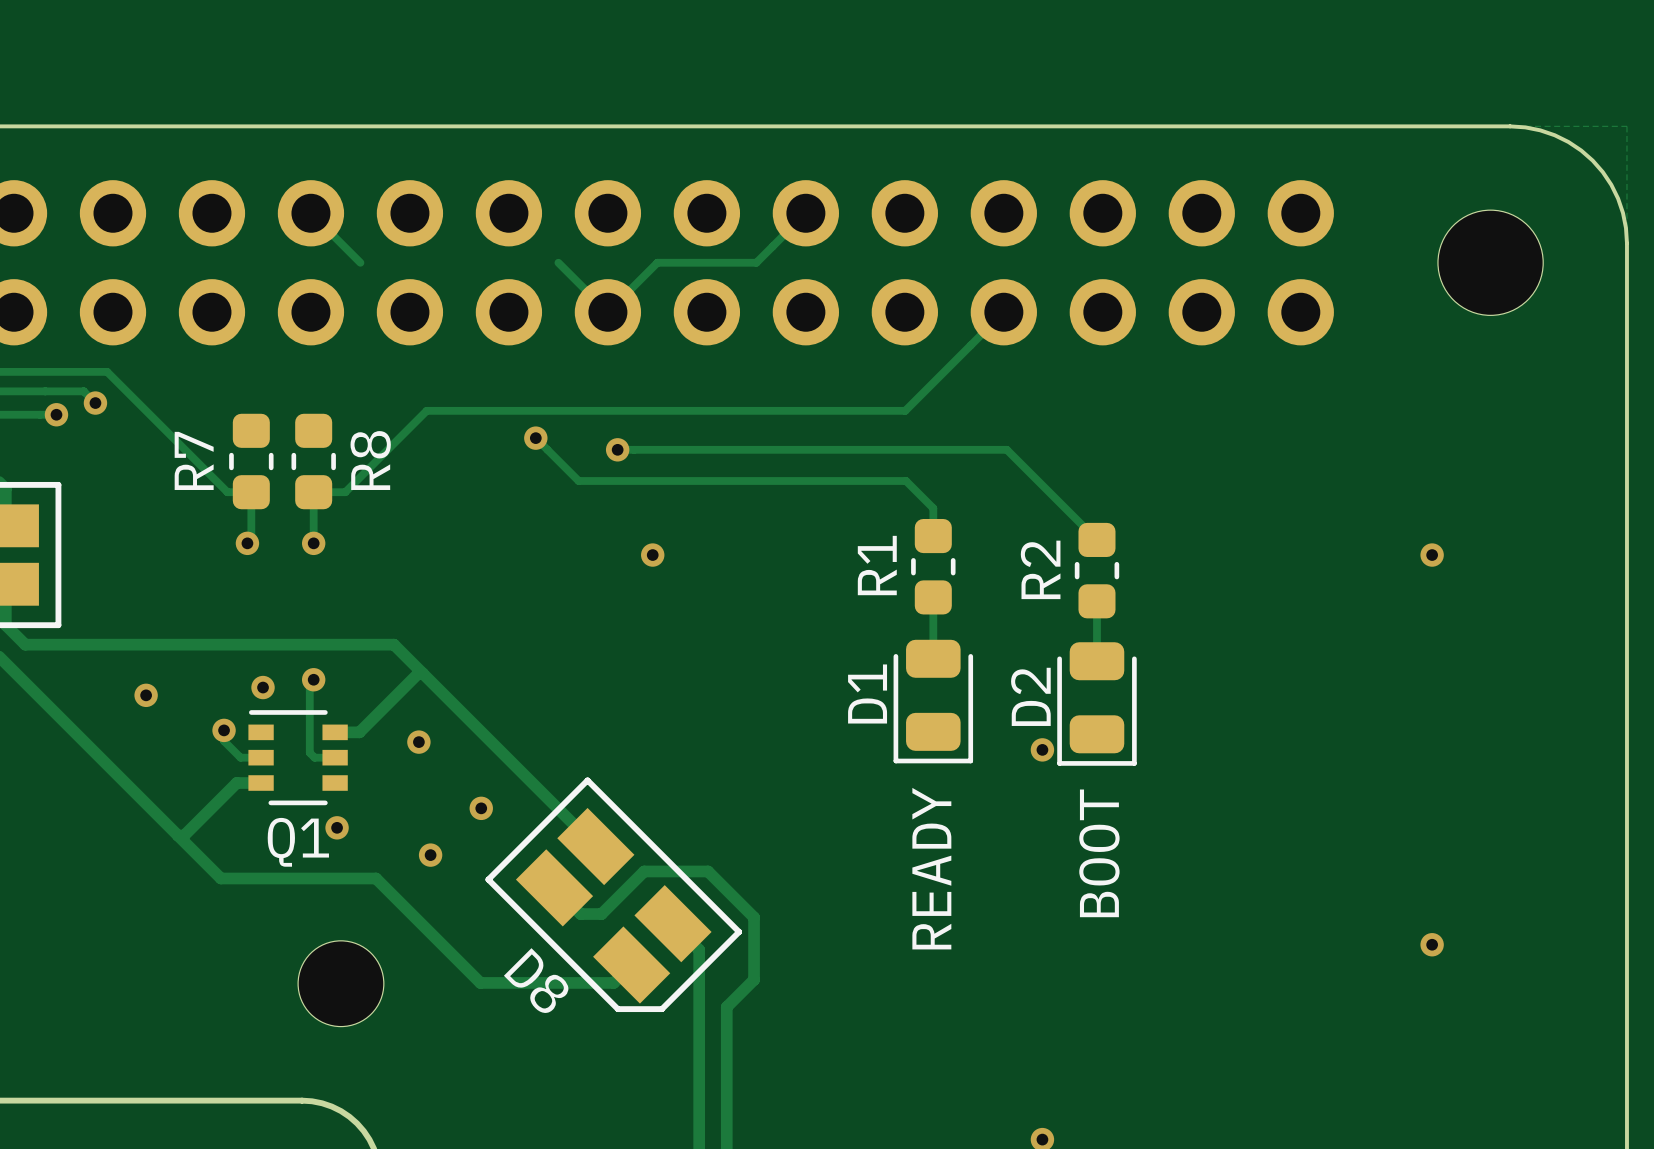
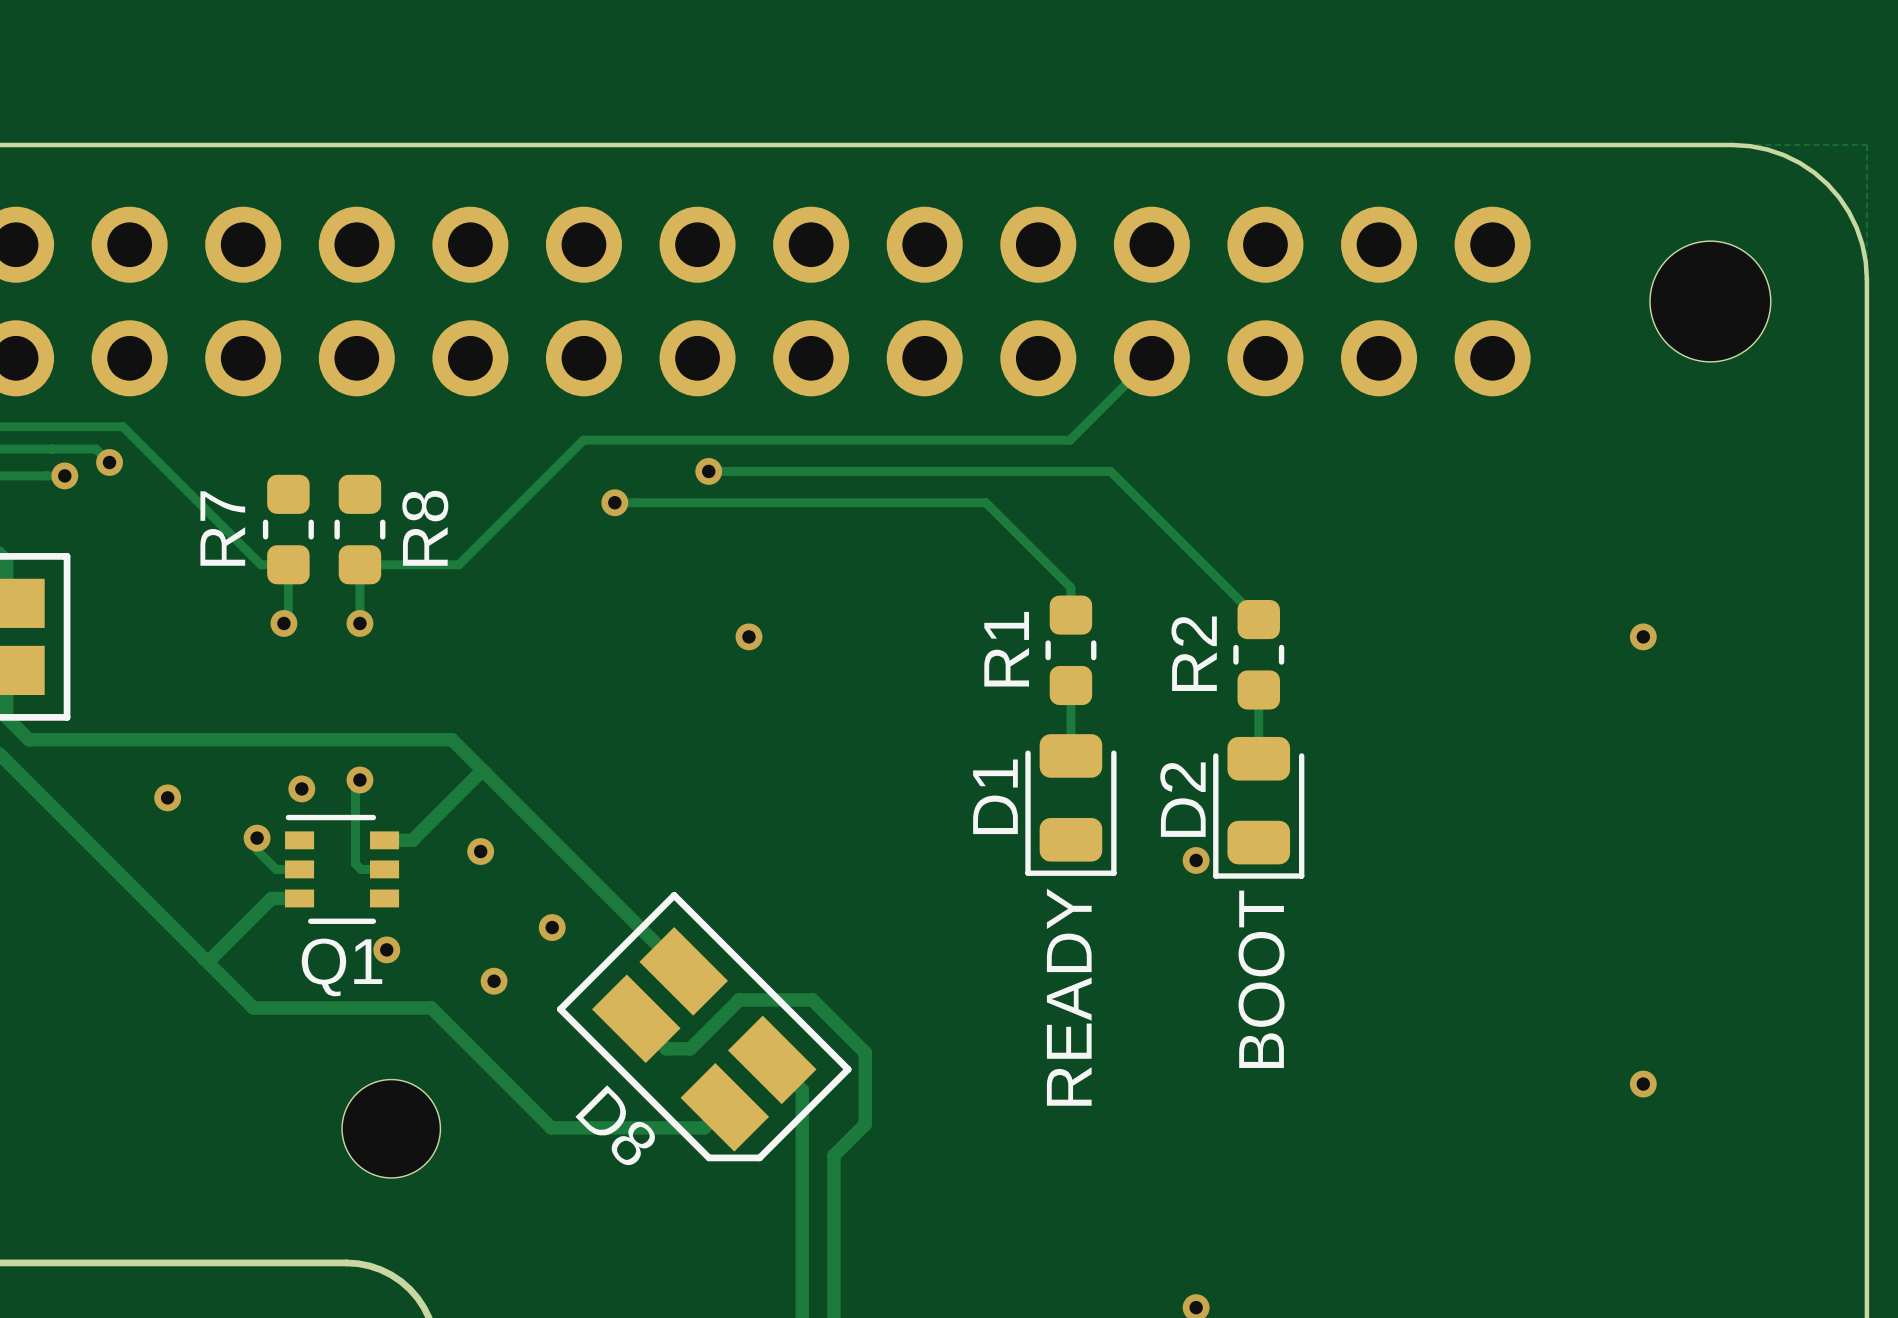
track: (310, 213) (360, 262) -> none
track: (805, 213) (756, 262) (657, 262) (607, 312) (558, 262) -> none
track: (932, 383) (905, 410) -> (1155, 516) (1110, 471) (1038, 471)
track: (617, 410) (426, 410) (345, 492) -> (1070, 440) (583, 440) (458, 564) (396, 564)
track: (535, 438) (578, 480) (906, 480) (933, 508) (933, 512) -> (614, 502) (985, 502) (1070, 587)
track: (617, 449) (1006, 449) -> none
via position: (617, 449) -> (708, 471)

